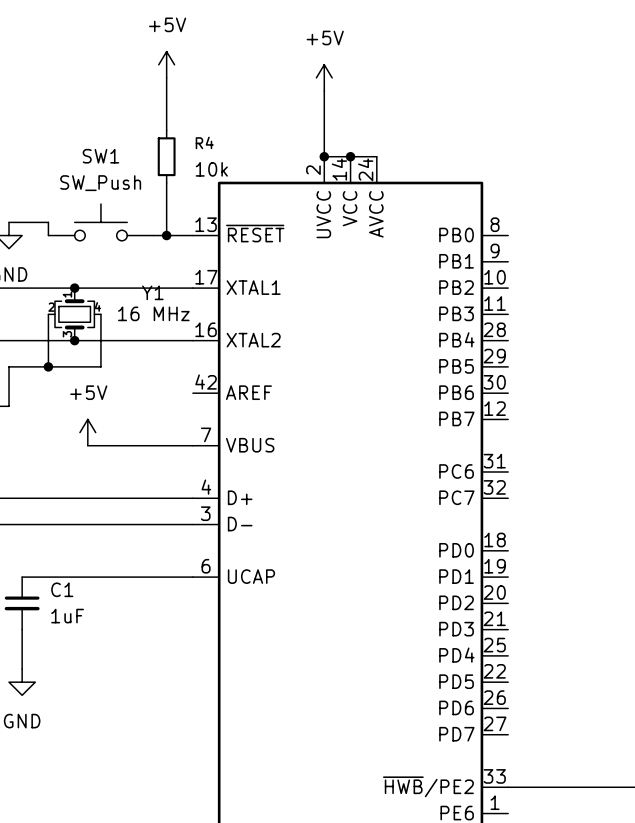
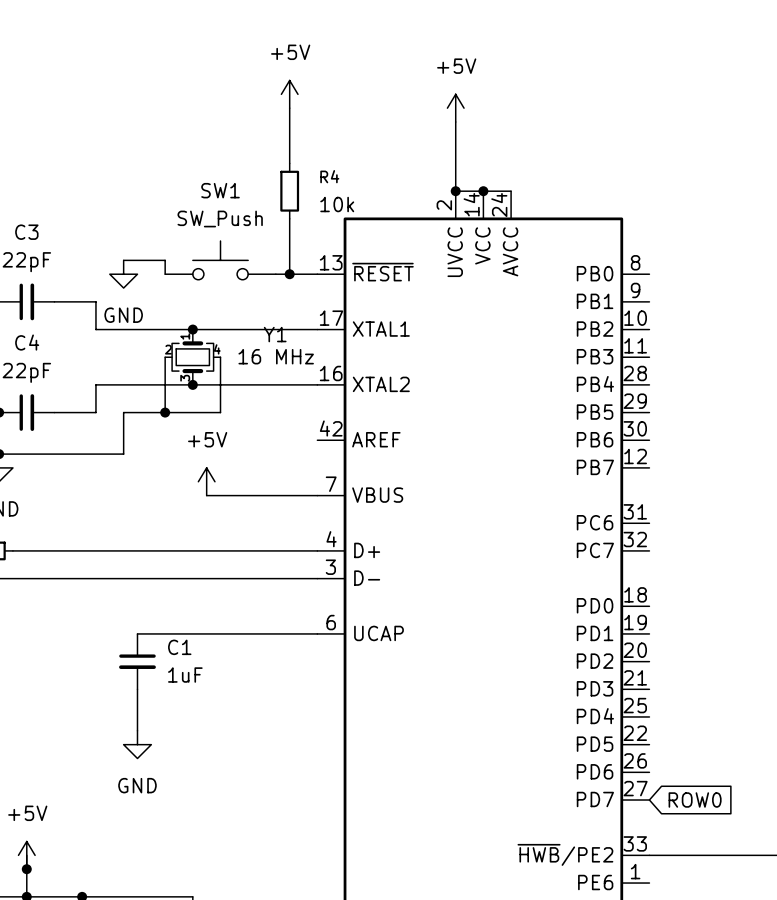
global label: none -> ROW0 (695, 800)

